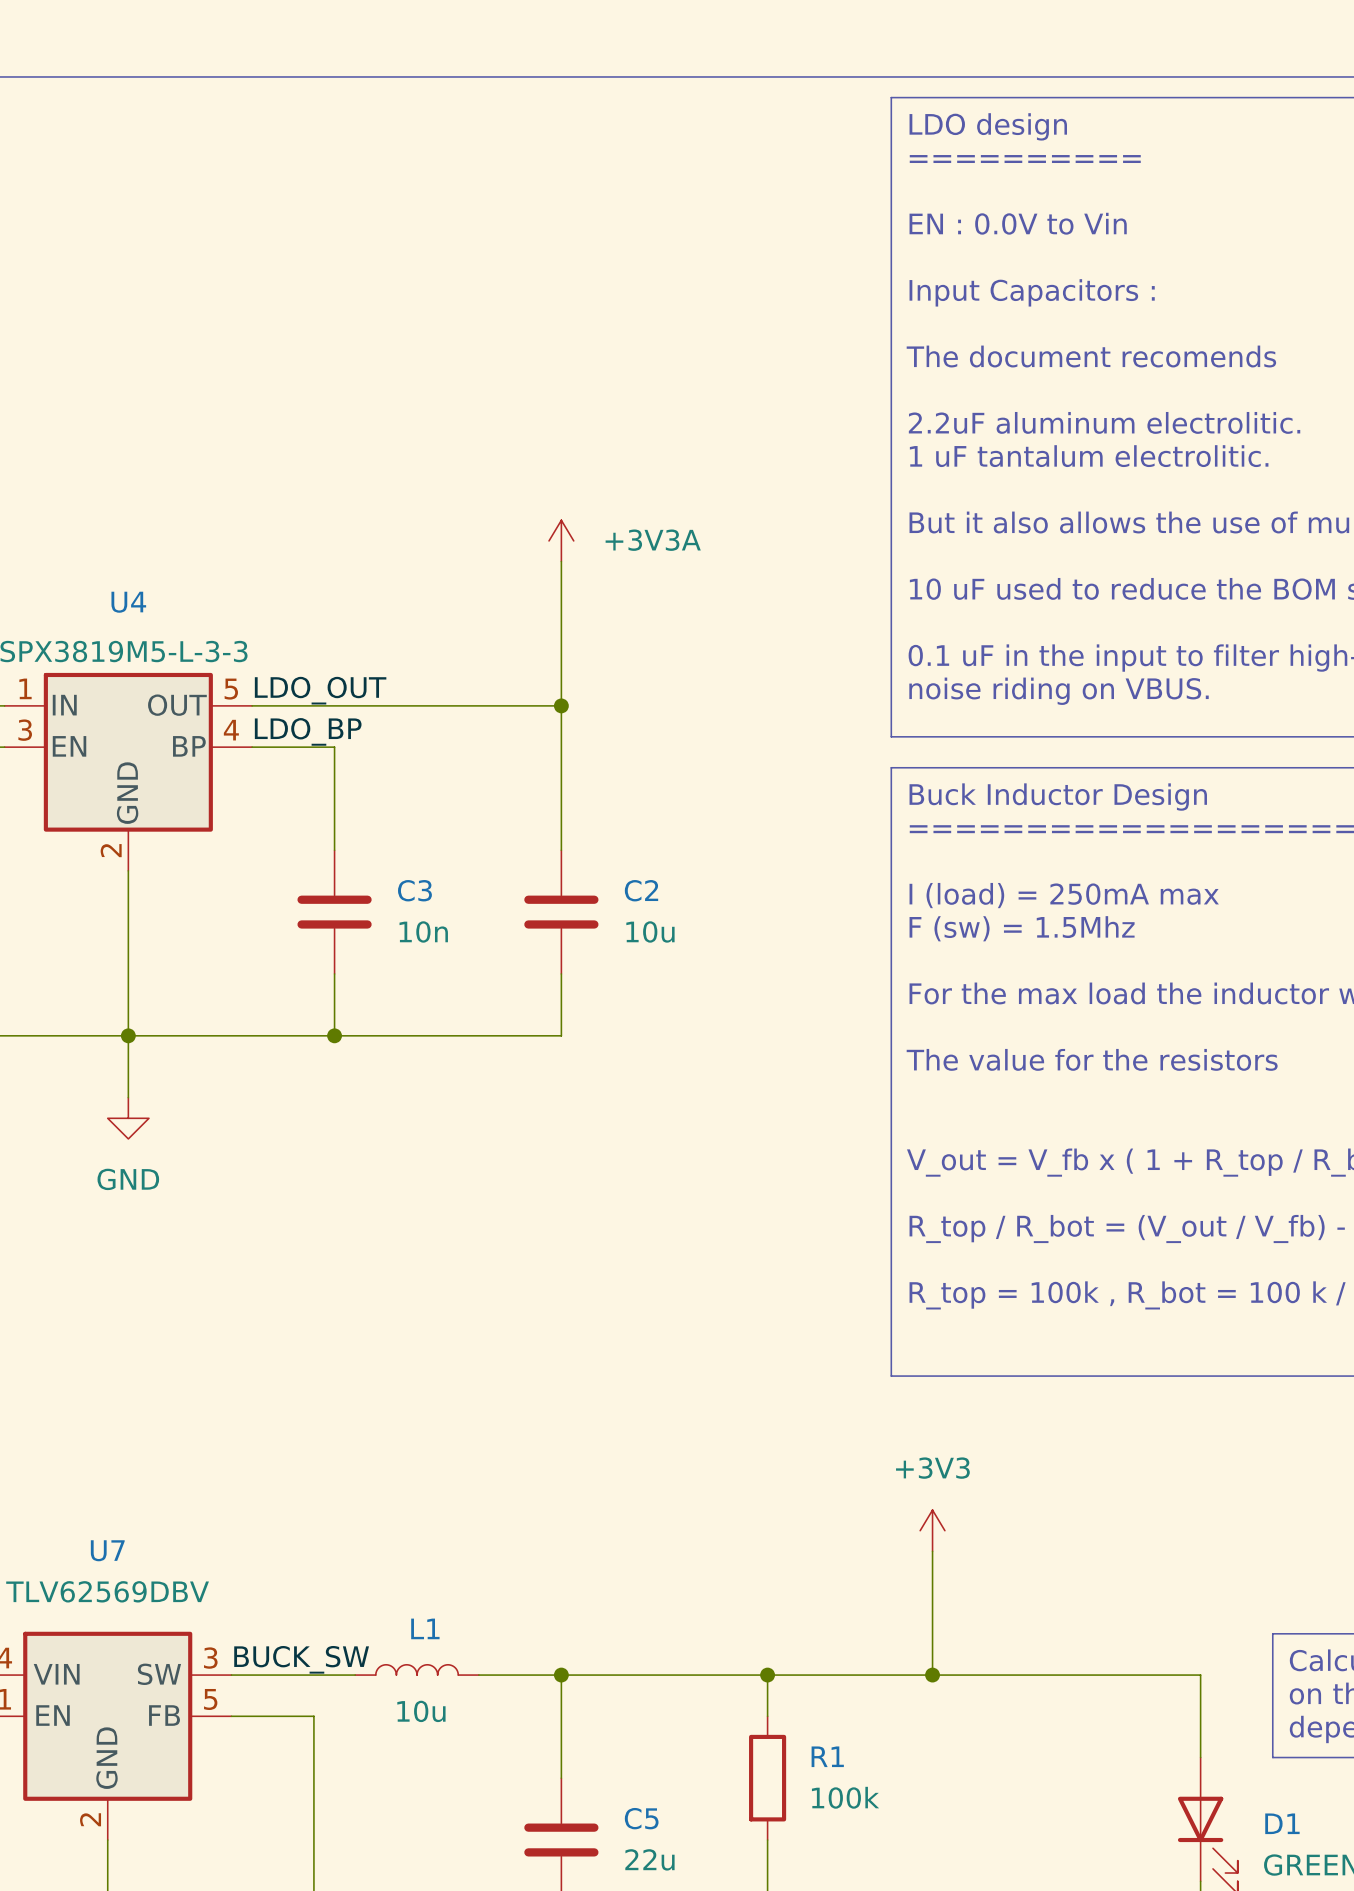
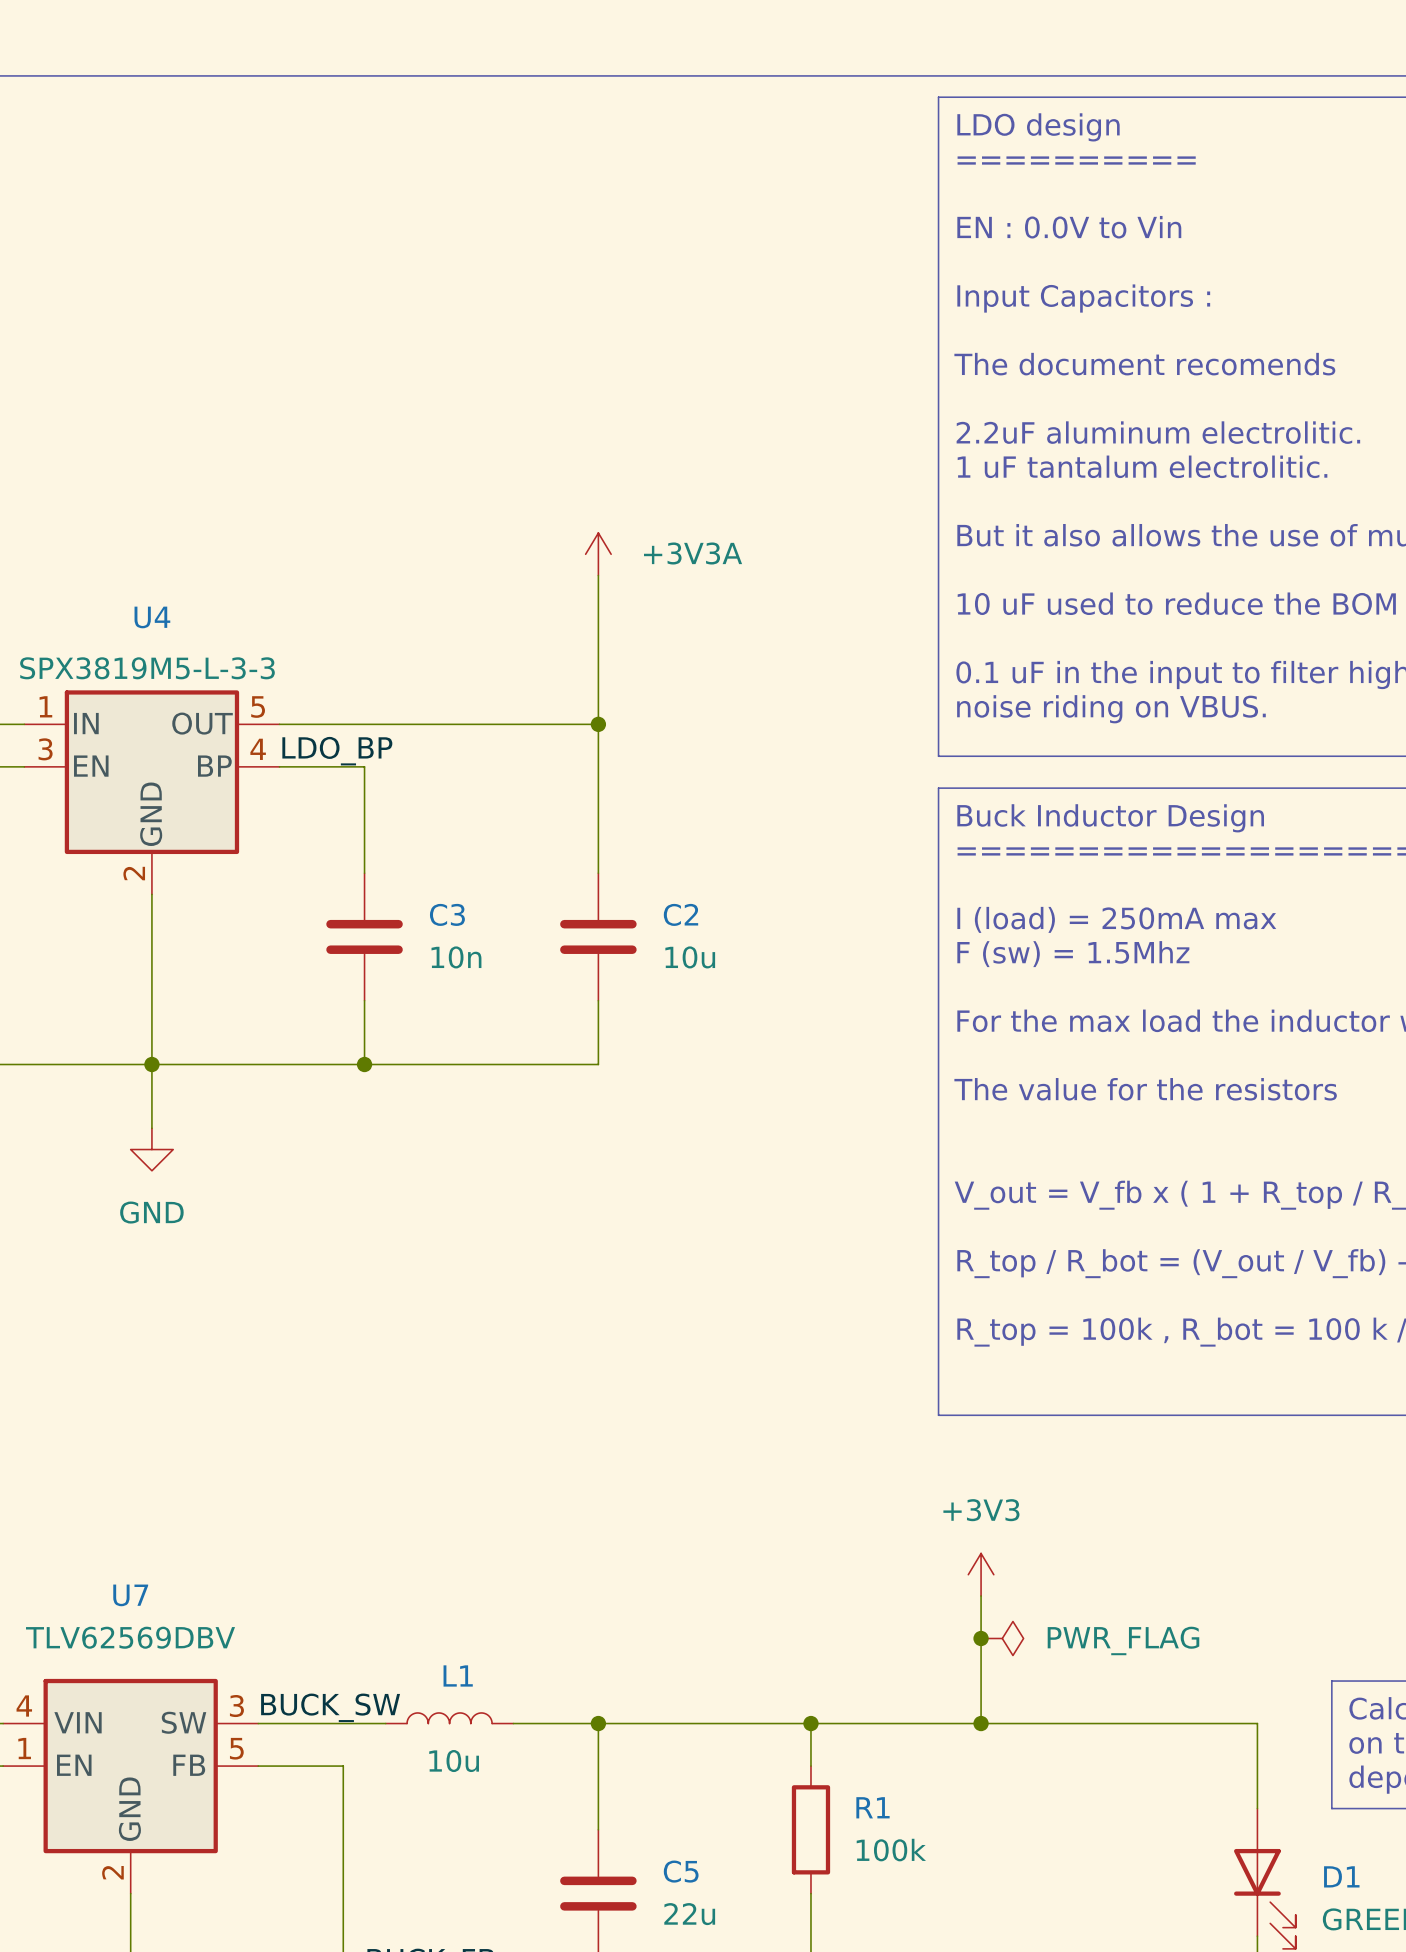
label: LDO_OUT (320, 690) -> none
junction: none -> (981, 1638)
power symbol: none -> PWR_FLAG (1002, 1638)

